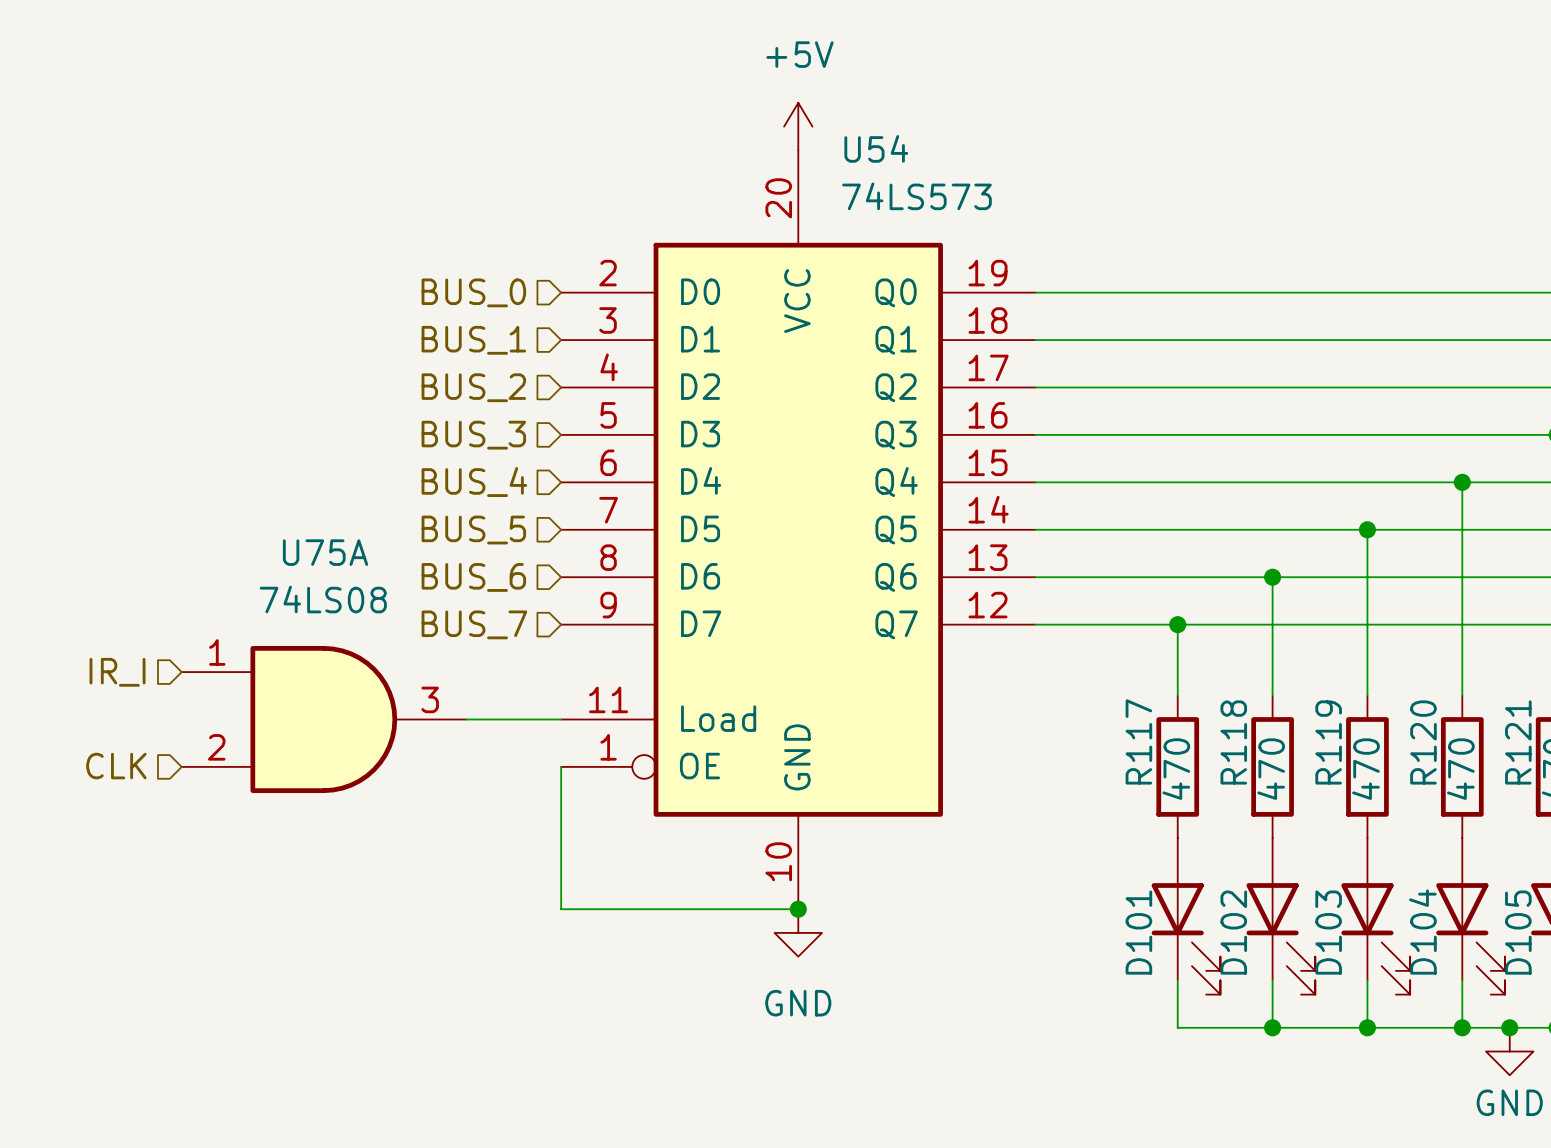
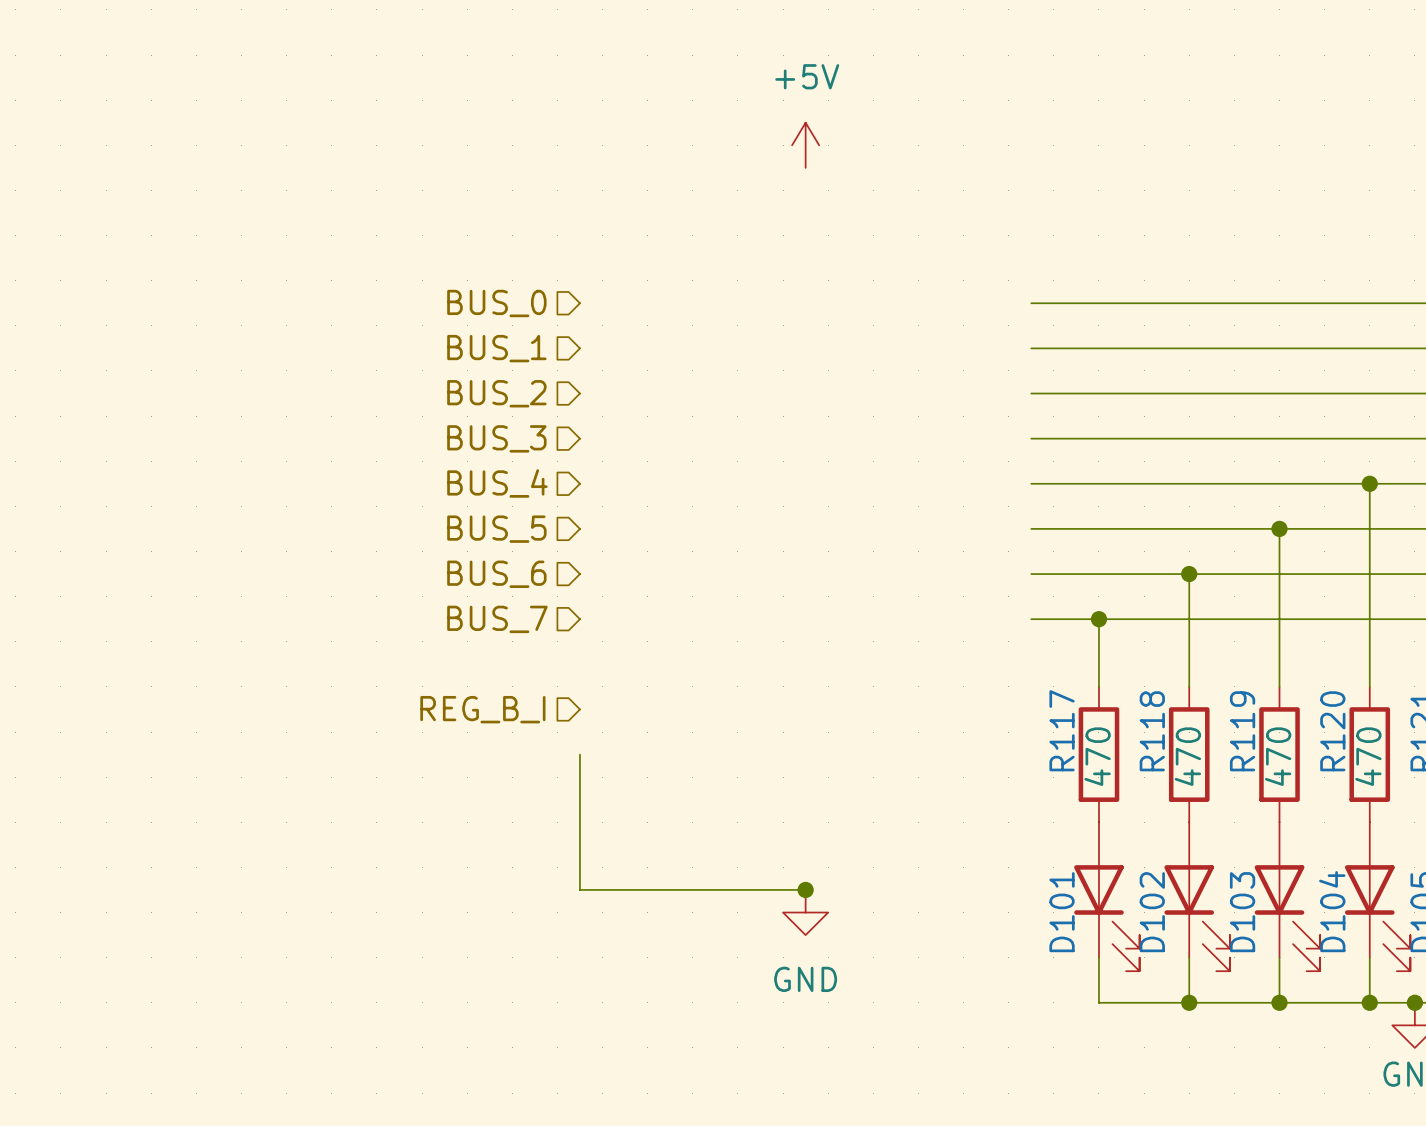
power symbol position: +5V (798, 126) -> +5V (805, 145)
hierarchical label position: BUS_0 (473, 292) -> BUS_0 (496, 303)
wire: (1035, 292) (1106, 292) -> none
hierarchical label position: BUS_1 (473, 340) -> BUS_1 (496, 348)
wire: (1035, 340) (1106, 340) -> none
hierarchical label position: BUS_2 (473, 387) -> BUS_2 (496, 393)
wire: (1035, 387) (1106, 387) -> none
wire: (1035, 434) (1106, 434) -> none
hierarchical label position: BUS_3 (473, 435) -> BUS_3 (496, 438)
hierarchical label position: BUS_4 (474, 482) -> BUS_4 (497, 483)
wire: (1035, 482) (1106, 482) -> none
U54: 74LS573 (798, 529) -> none
wire: (1035, 529) (1106, 529) -> none
hierarchical label position: BUS_5 (473, 530) -> BUS_5 (496, 529)
hierarchical label position: BUS_6 (473, 577) -> BUS_6 (496, 574)
wire: (1035, 577) (1106, 577) -> none
hierarchical label position: BUS_7 (474, 624) -> BUS_7 (497, 619)
wire: (1035, 624) (1106, 624) -> (737, 889) (805, 889)
hierarchical label: IR_I (117, 672) -> none
U75A: 74LS08 (323, 719) -> none
wire: (466, 719) (561, 719) -> none
hierarchical label: none -> REG_B_I (482, 709)
hierarchical label: CLK (116, 766) -> none
wire: (561, 766) (561, 909) (632, 909) -> (579, 754) (579, 889)
junction position: (798, 909) -> (805, 889)
power symbol position: GND (798, 932) -> GND (805, 912)

